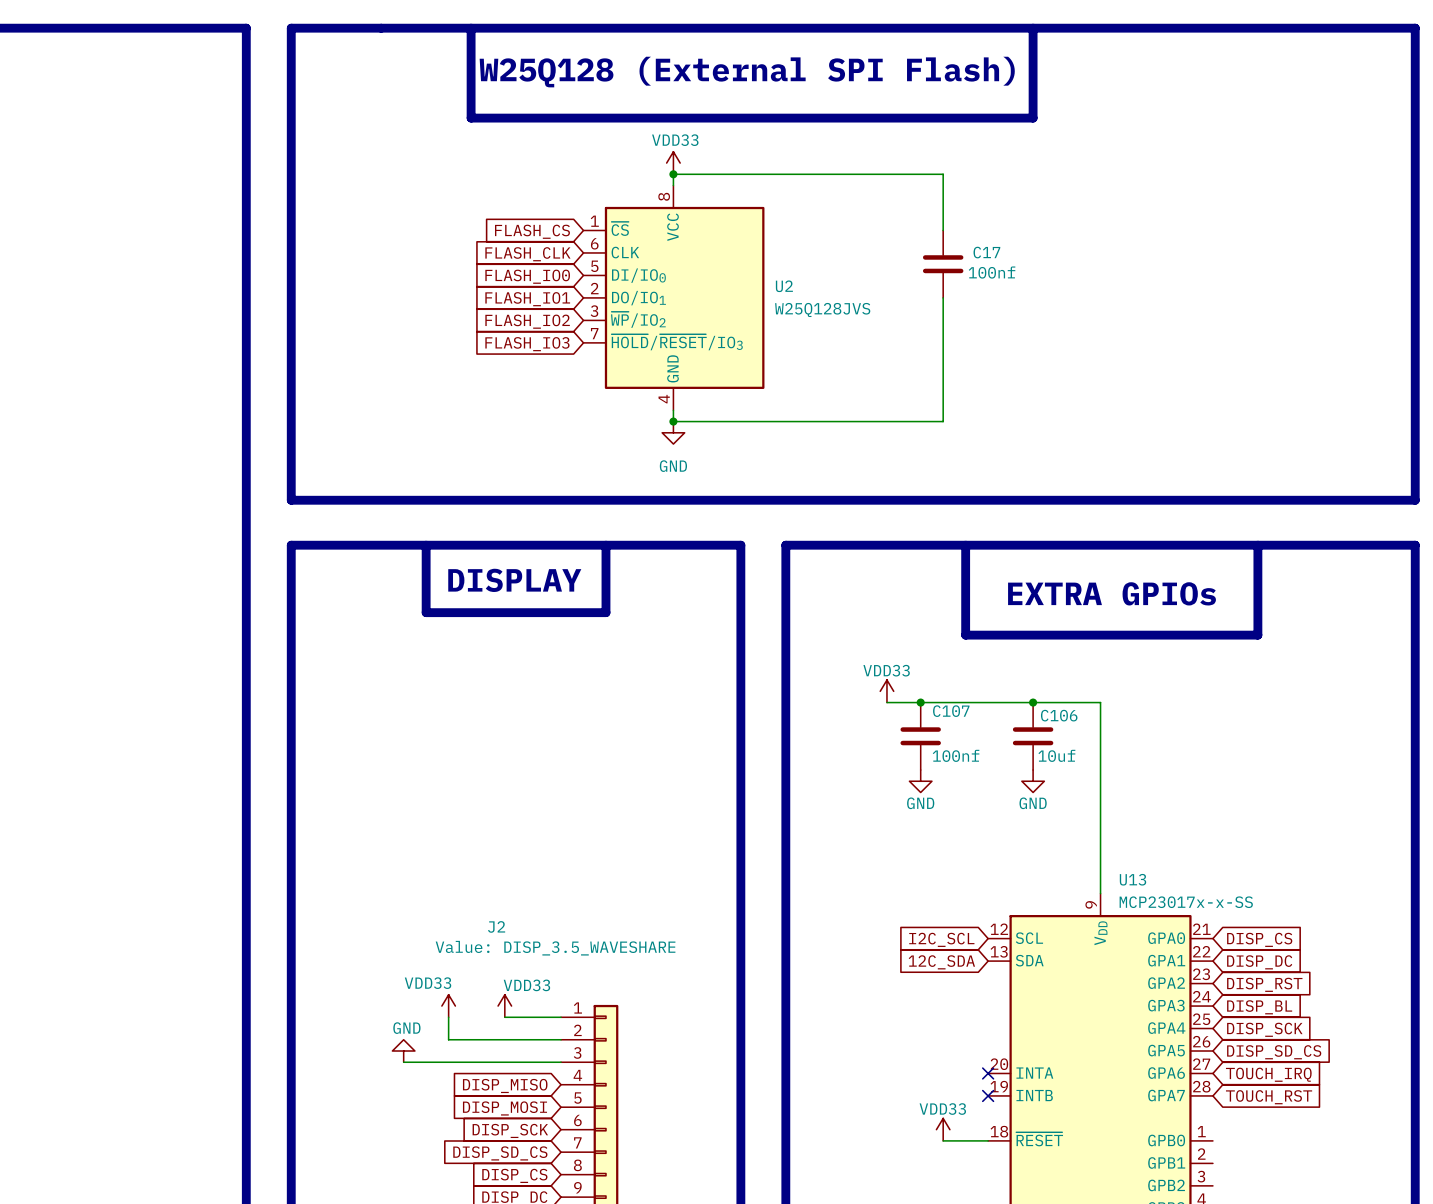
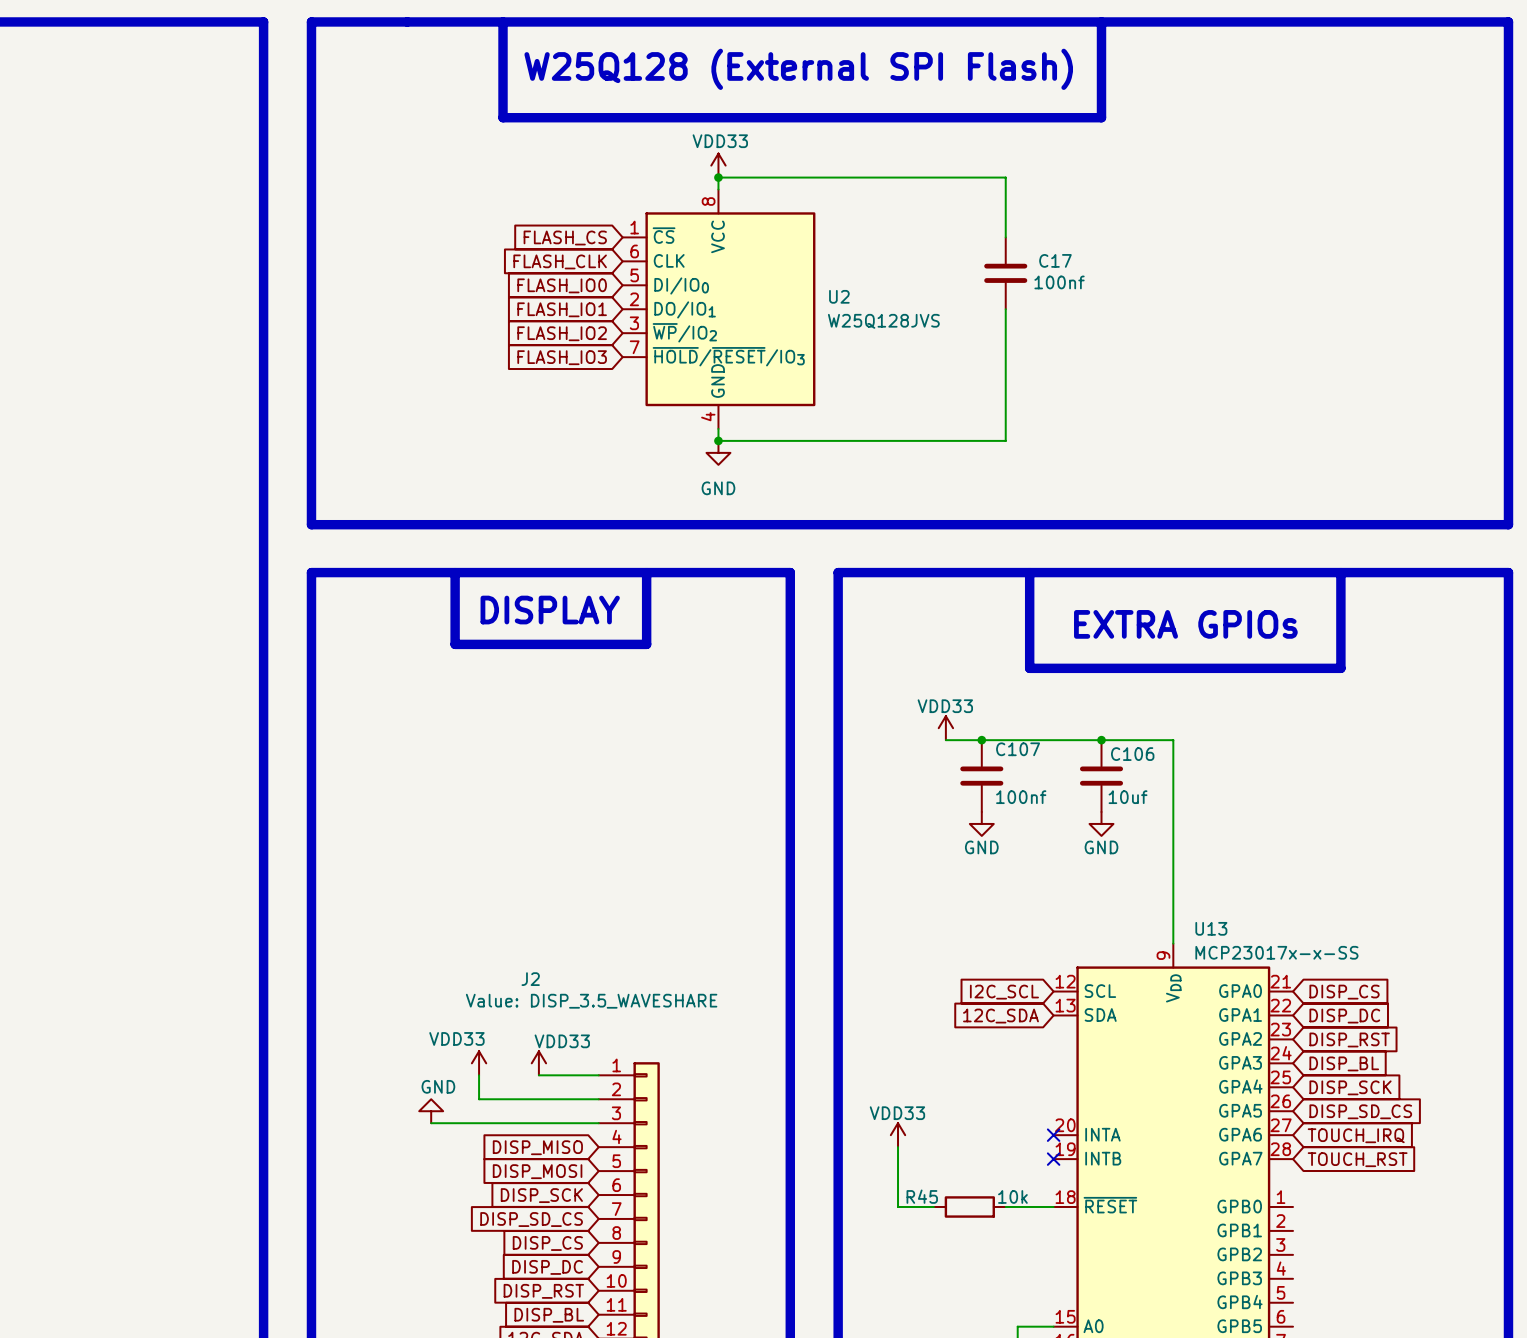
wire: none -> (898, 1147) (898, 1206) (933, 1206)
power symbol position: VDD33 (943, 1129) -> VDD33 (898, 1135)
R45: none -> 10k (969, 1206)

